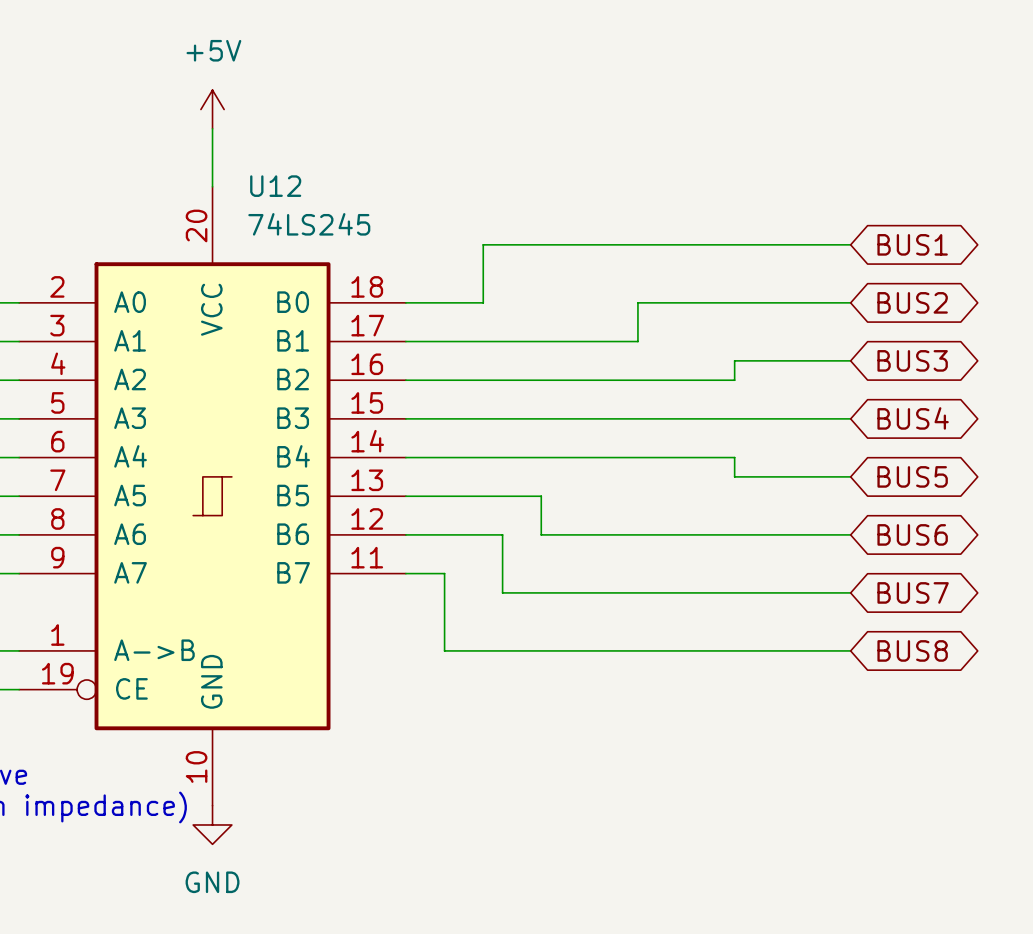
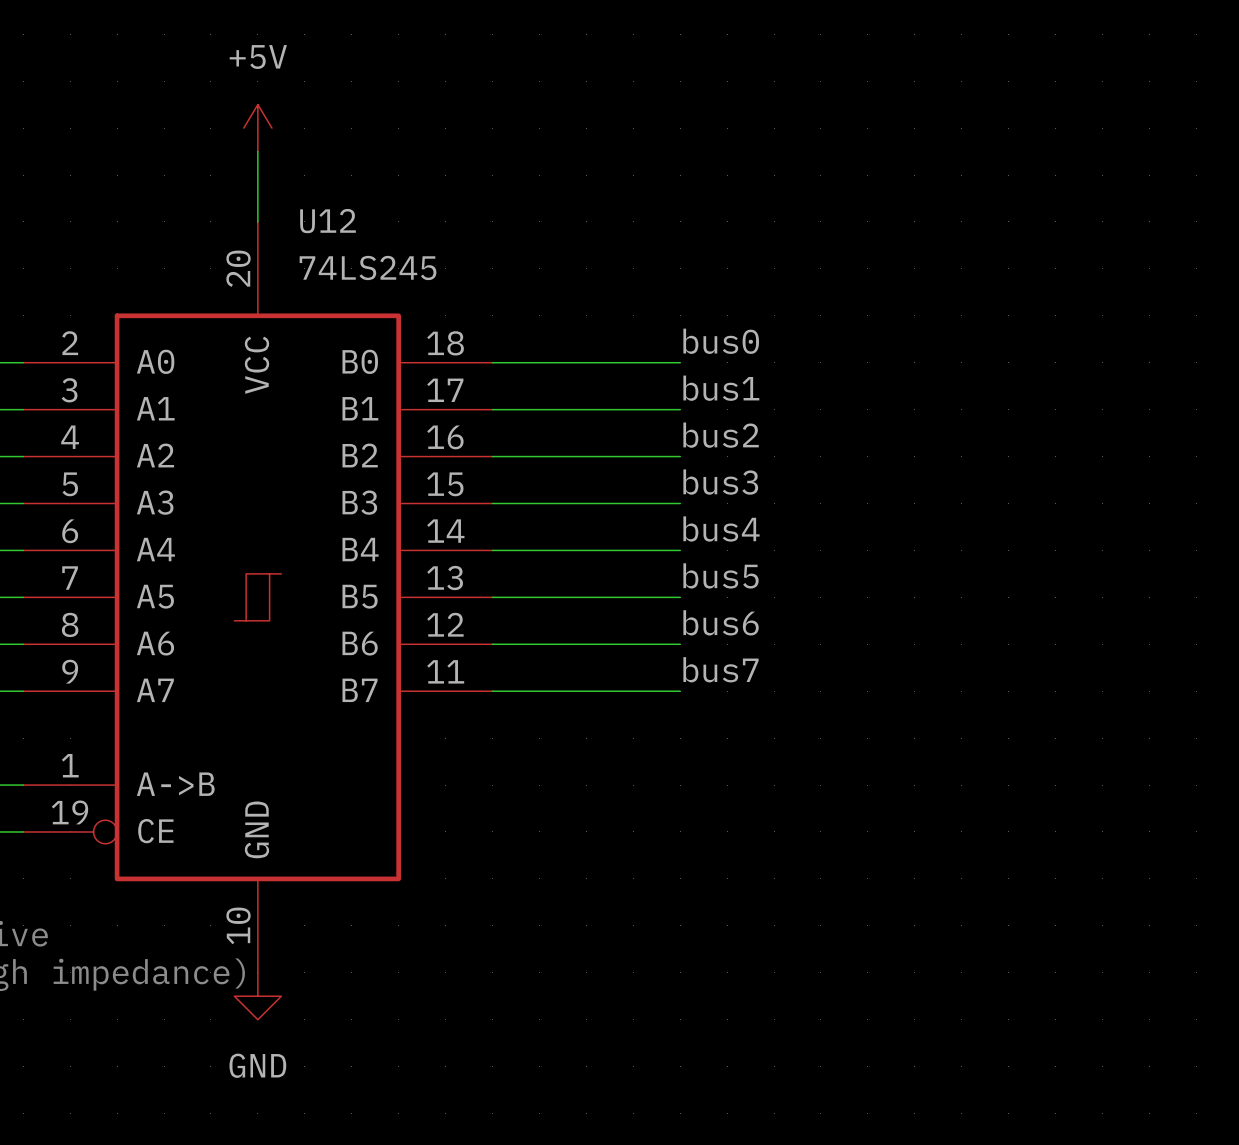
wire: (850, 244) (483, 244) (483, 302) -> (680, 362) (586, 362)
global label: BUS1 (912, 244) -> none
label: none -> bus0 (721, 341)
wire: (850, 302) (637, 302) (637, 341) (560, 341) -> none
global label: BUS2 (912, 302) -> none
label: none -> bus1 (721, 388)
wire: (850, 360) (734, 360) (734, 380) (560, 380) -> none
global label: BUS3 (912, 360) -> none
label: none -> bus2 (721, 435)
label: none -> bus3 (720, 482)
wire: (560, 418) (850, 418) -> none
global label: BUS4 (913, 418) -> none
label: none -> bus4 (721, 528)
wire: (560, 457) (734, 457) (734, 476) (850, 476) -> none
global label: BUS5 (912, 476) -> none
label: none -> bus5 (721, 575)
wire: (541, 496) (541, 534) -> (656, 597) (680, 597)
label: none -> bus6 (721, 622)
wire: (502, 534) (502, 592) (850, 592) -> (609, 644) (656, 644)
wire: (560, 534) (850, 534) -> none
global label: BUS6 (912, 534) -> none
label: none -> bus7 (720, 669)
wire: (444, 573) (444, 650) (850, 650) -> (539, 691) (680, 691)
global label: BUS7 (913, 592) -> none
global label: BUS8 (912, 650) -> none

